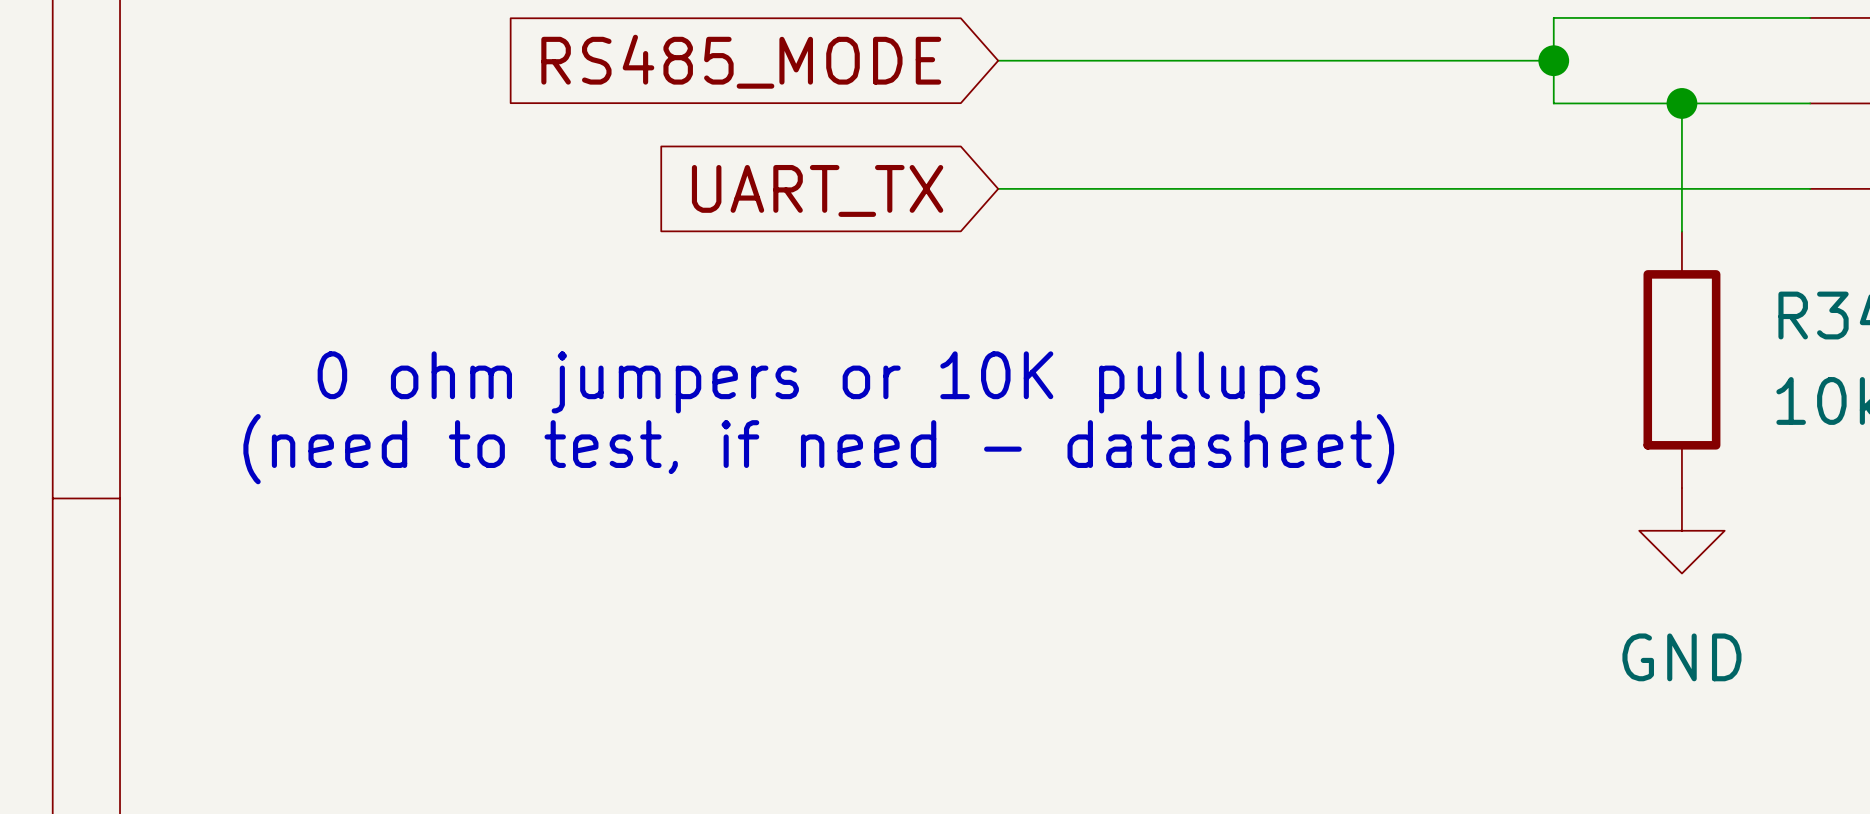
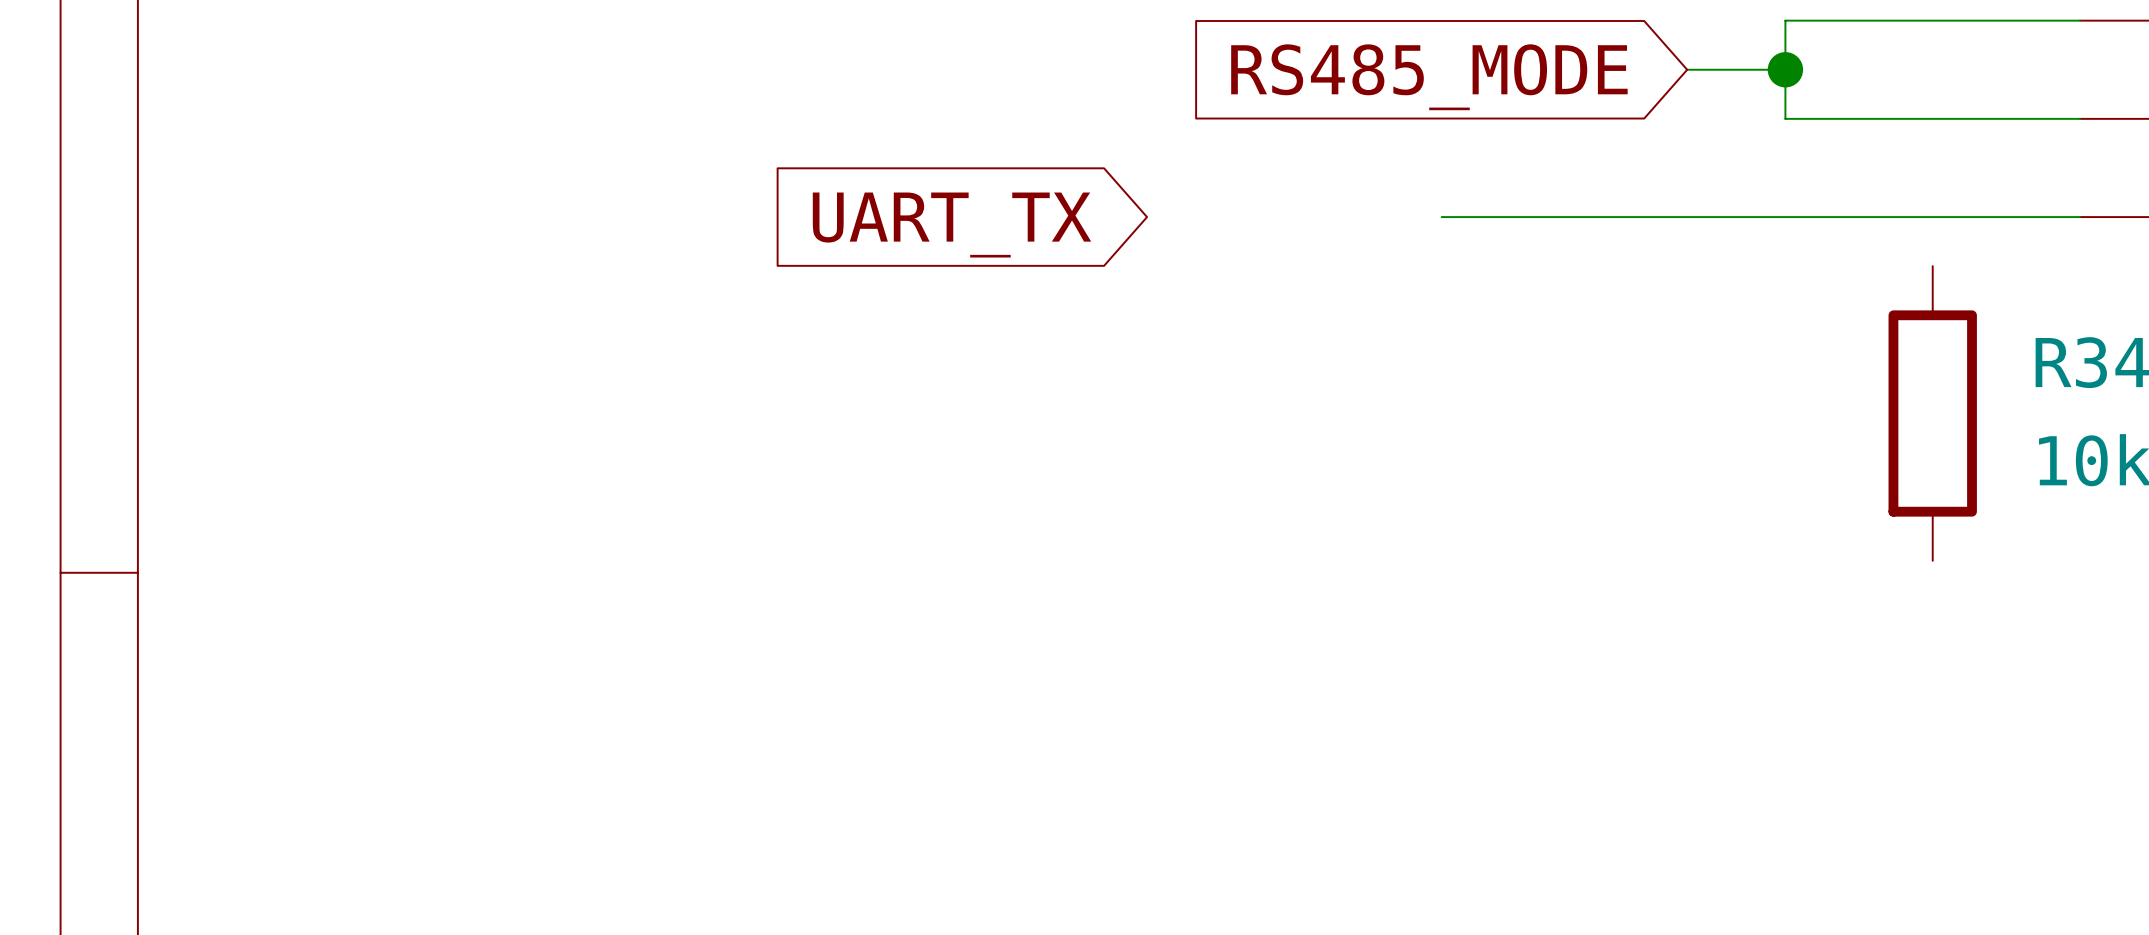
wire: (998, 60) (1468, 60) -> none
global label position: RS485_MODE (741, 61) -> RS485_MODE (1429, 77)
wire: (1681, 103) (1681, 231) -> none
junction: (1681, 103) -> none
wire: (998, 188) (1254, 188) -> none
text: 0 ohm jumpers or 10K pullups (818, 382) -> none
text: (need to test, if need - datasheet) (818, 449) -> none
power symbol: GND (1681, 530) -> none

